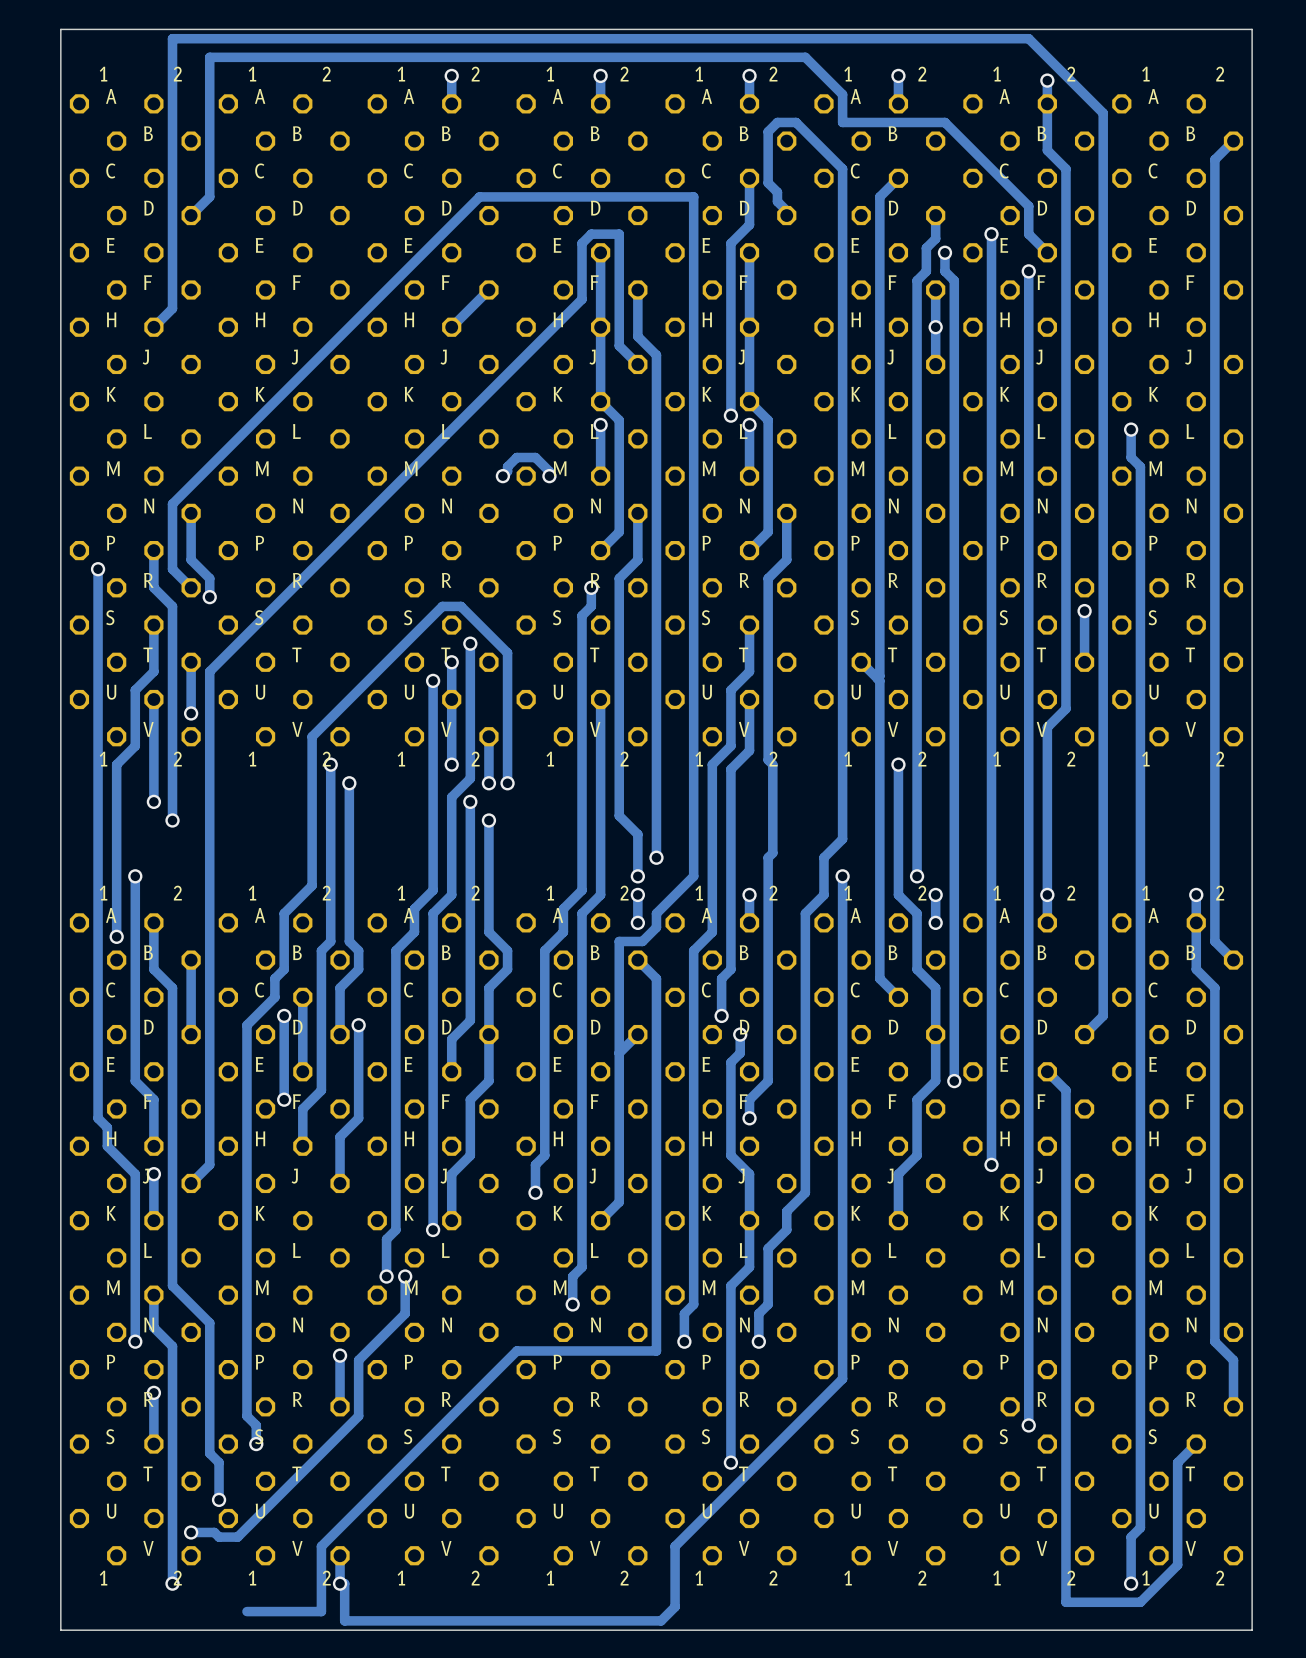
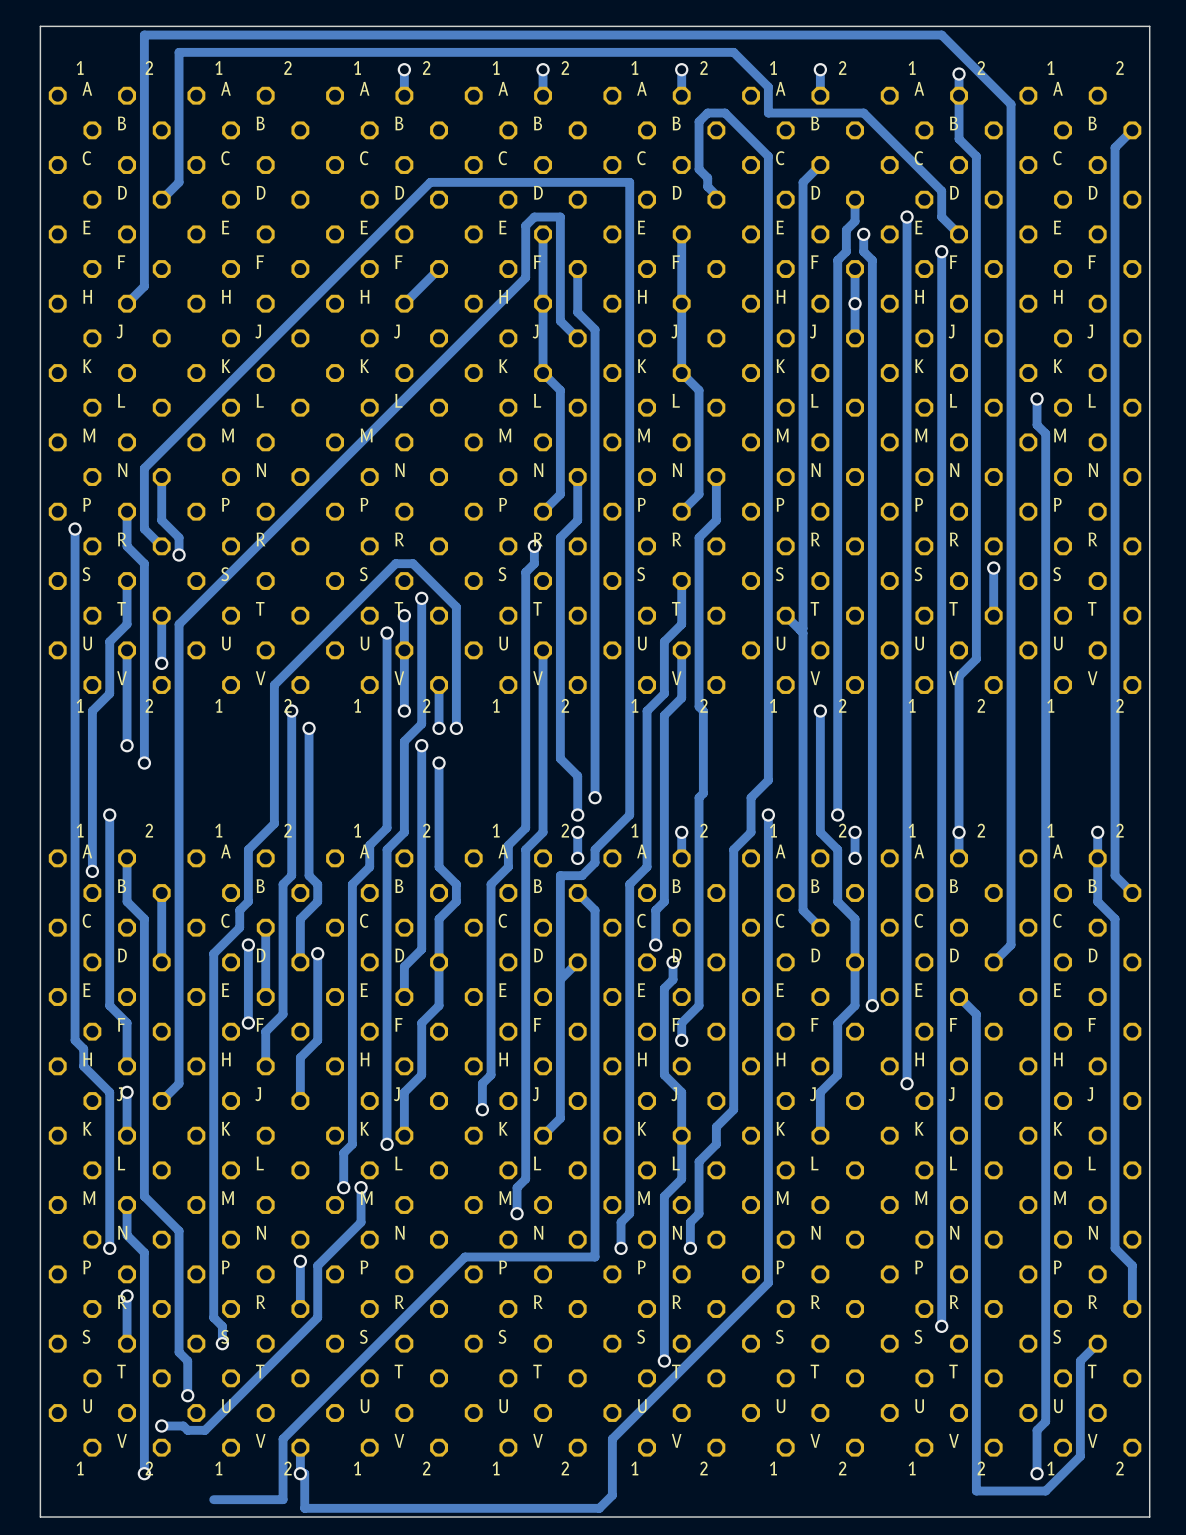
track: (749, 178) (749, 224) (730, 243) (730, 415) -> none
via: (730, 415) -> none
track: (600, 424) (600, 476) -> none
via: (600, 424) -> none
track: (749, 424) (749, 476) -> none
via: (749, 424) -> none
via: (502, 476) -> none
track: (549, 476) (549, 471) (535, 457) (516, 457) (507, 466) (507, 471) (502, 476) -> none
via: (549, 476) -> none

